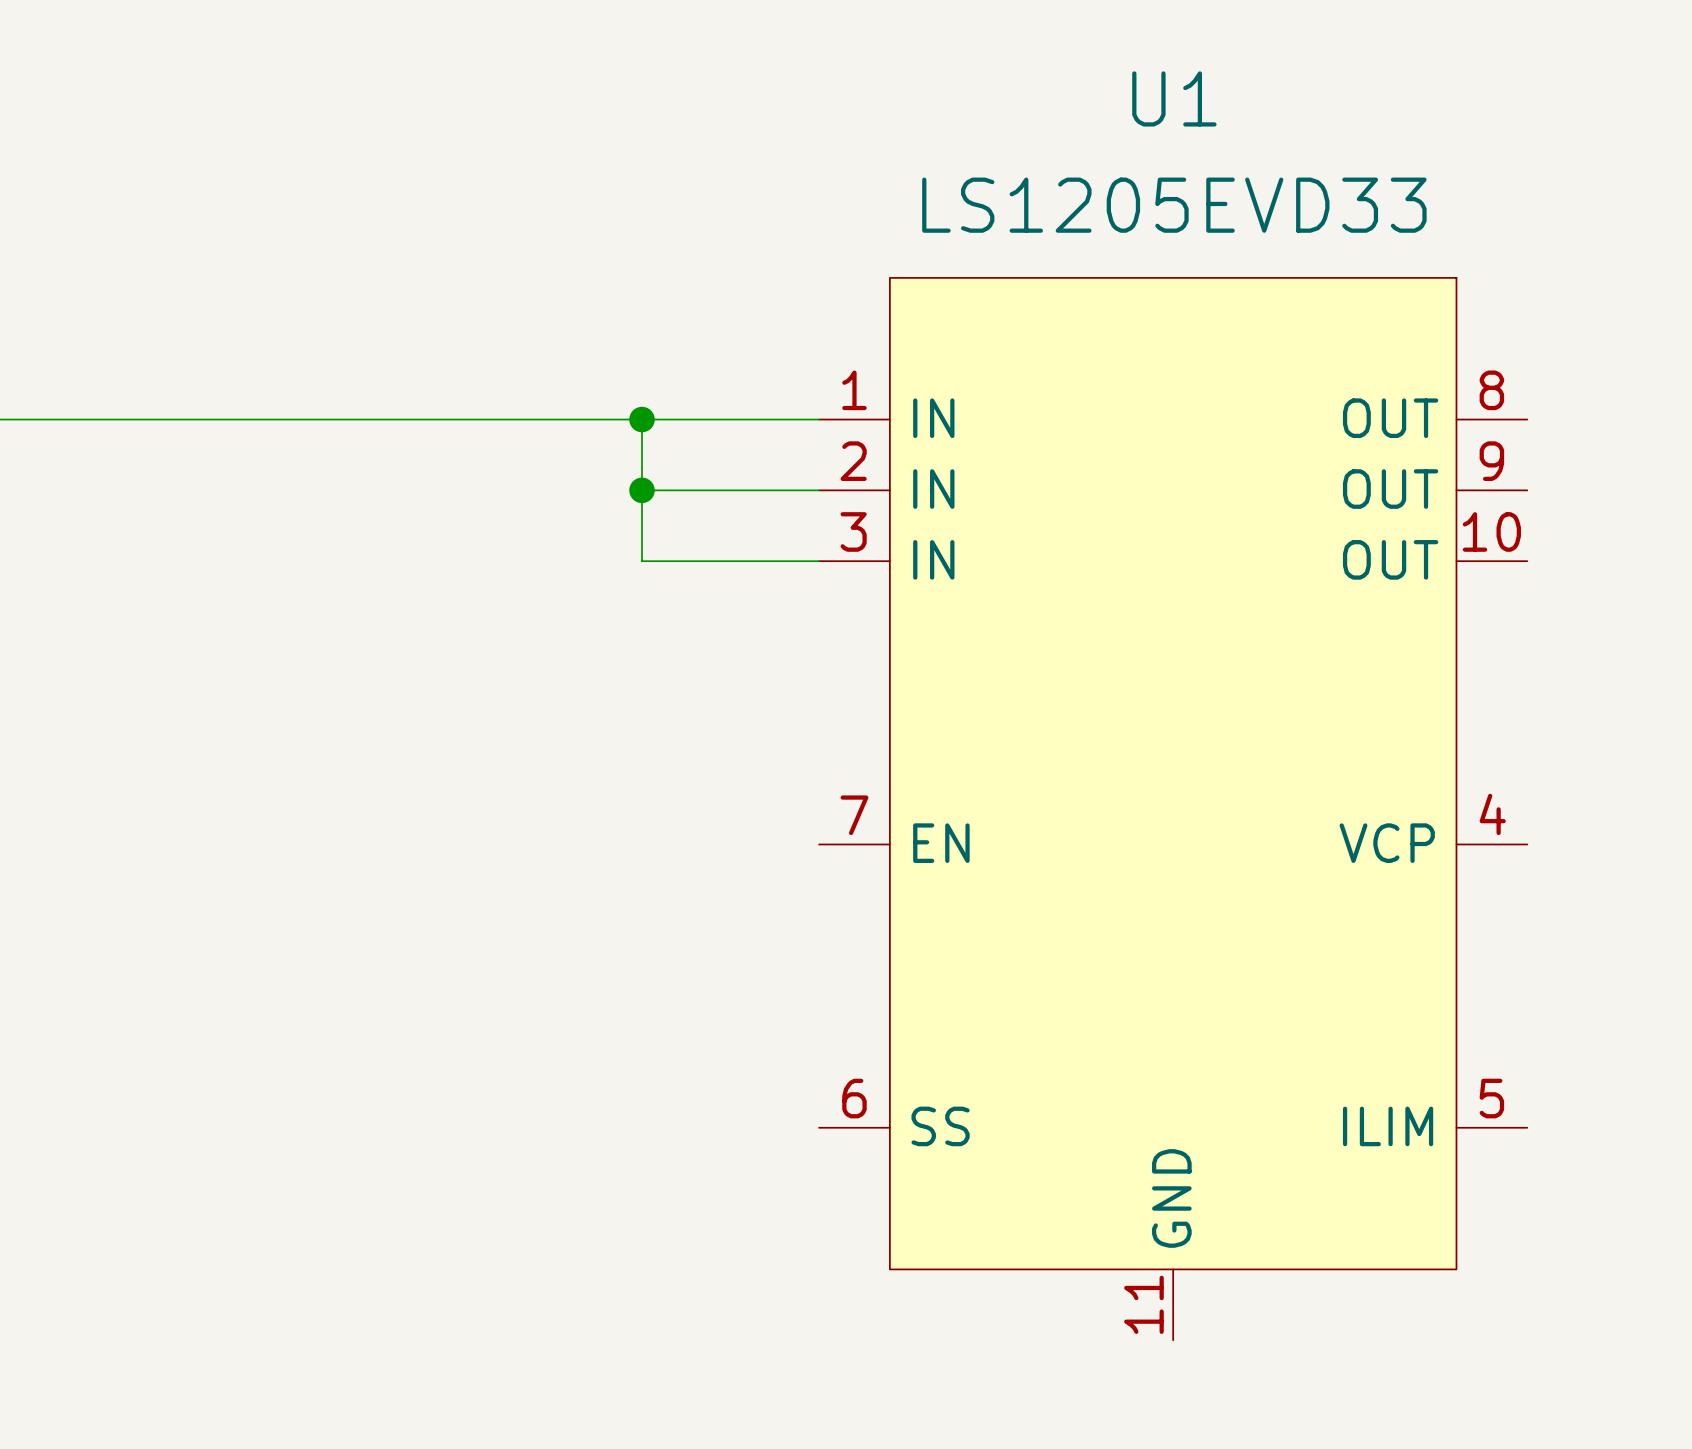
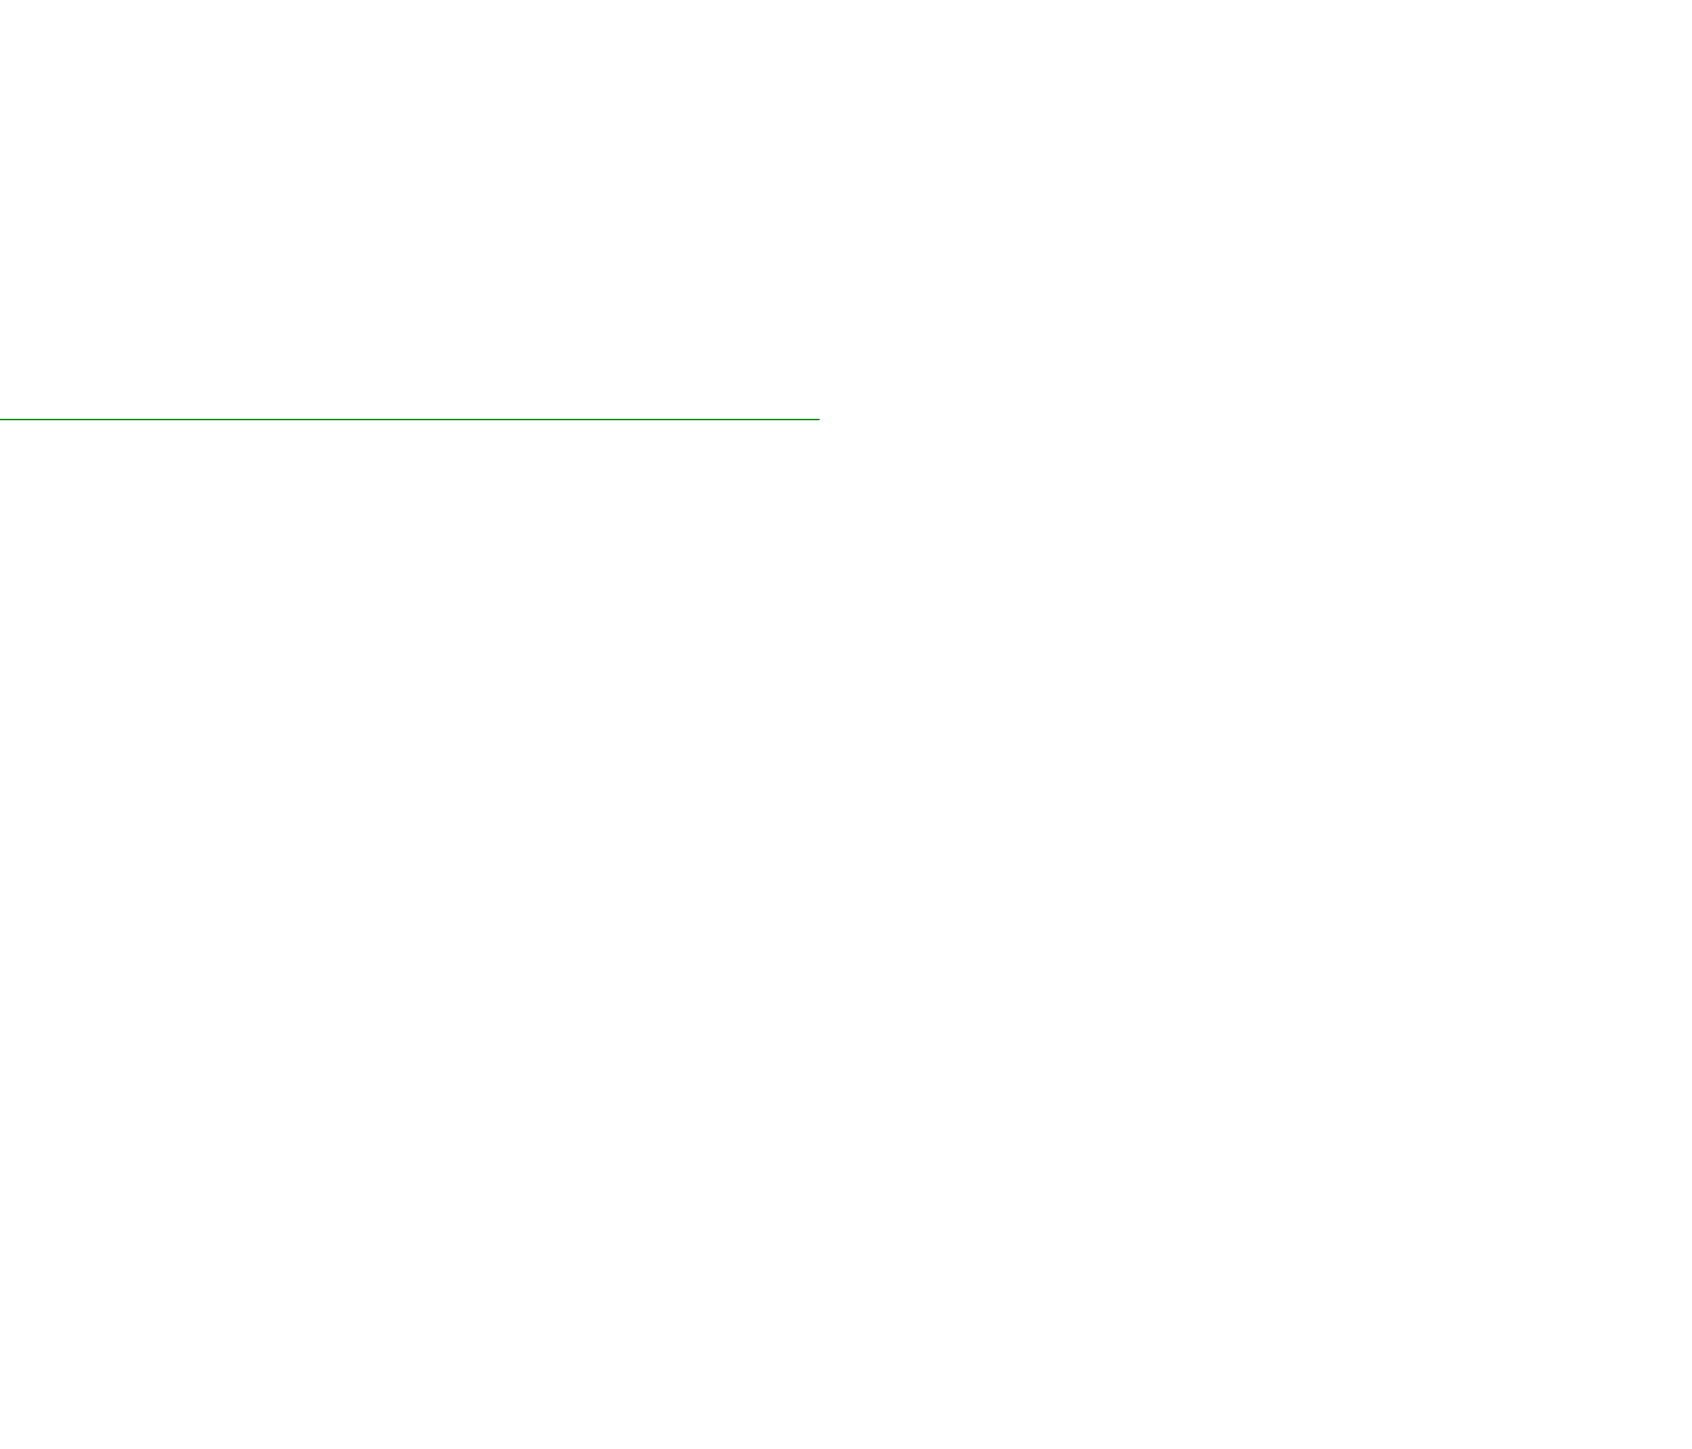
wire: (642, 419) (642, 561) (819, 561) -> none
junction: (642, 419) -> none
wire: (642, 490) (819, 490) -> none
junction: (642, 490) -> none
U1: LS1205EVD33 (1173, 808) -> none

